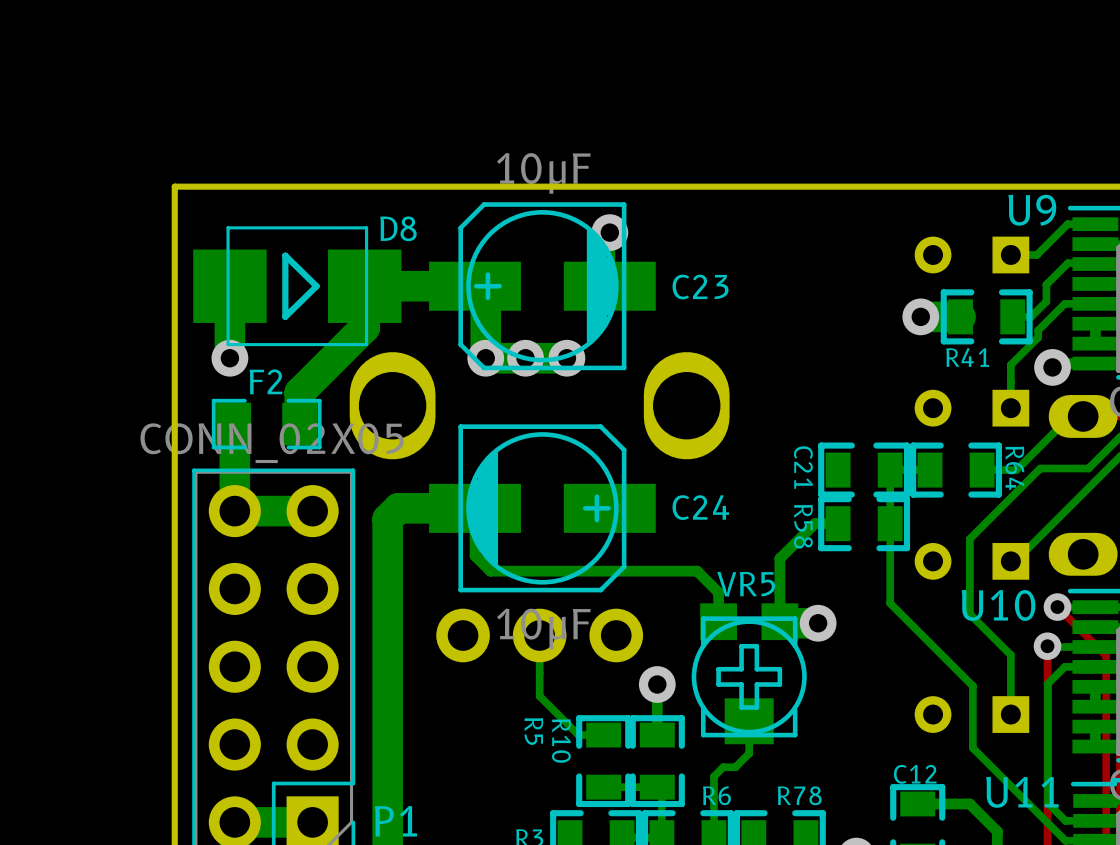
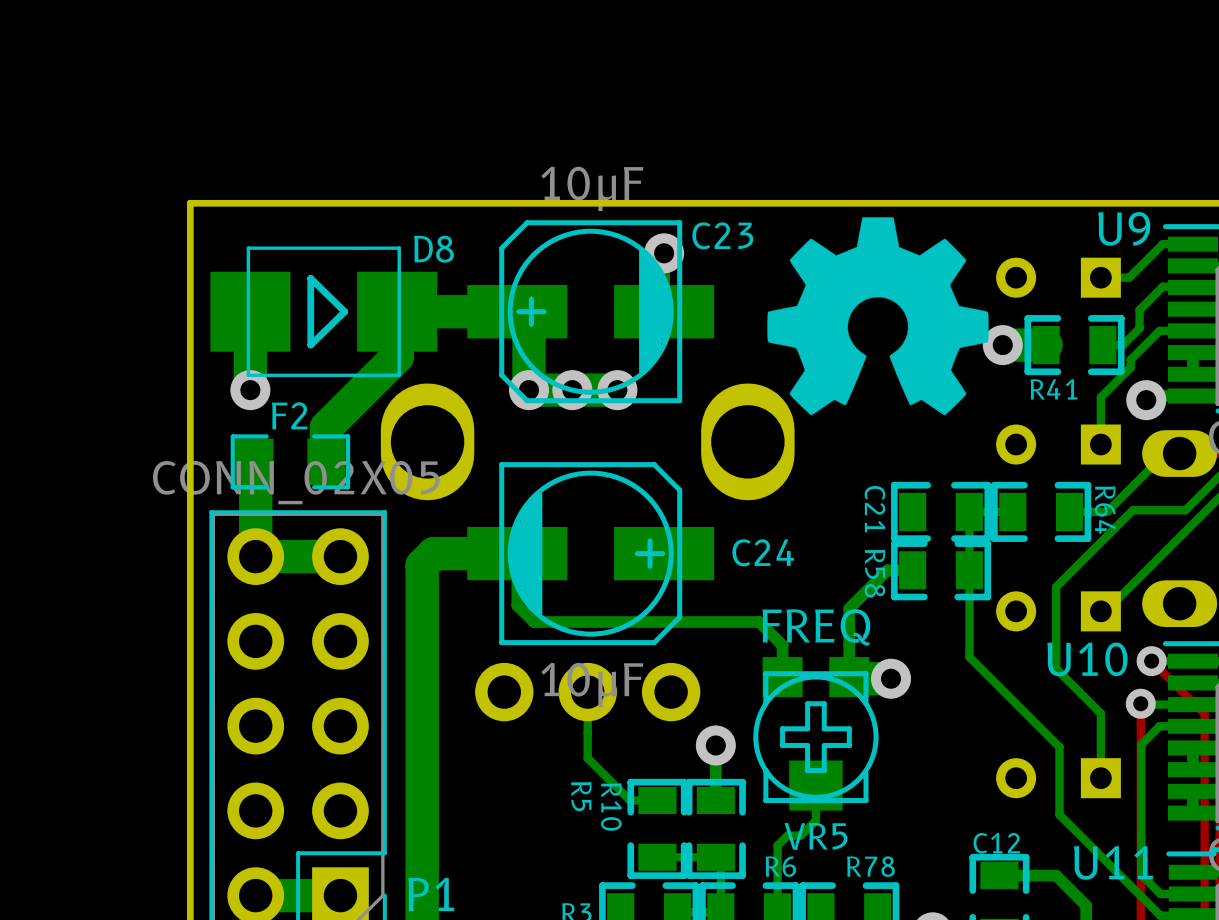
drawing: none -> [767, 217, 989, 416]
C23 name position: C23 (700, 287) -> C23 (722, 235)
text: none -> FREQ (816, 627)
VR5 name position: VR5 (746, 584) -> VR5 (815, 836)

